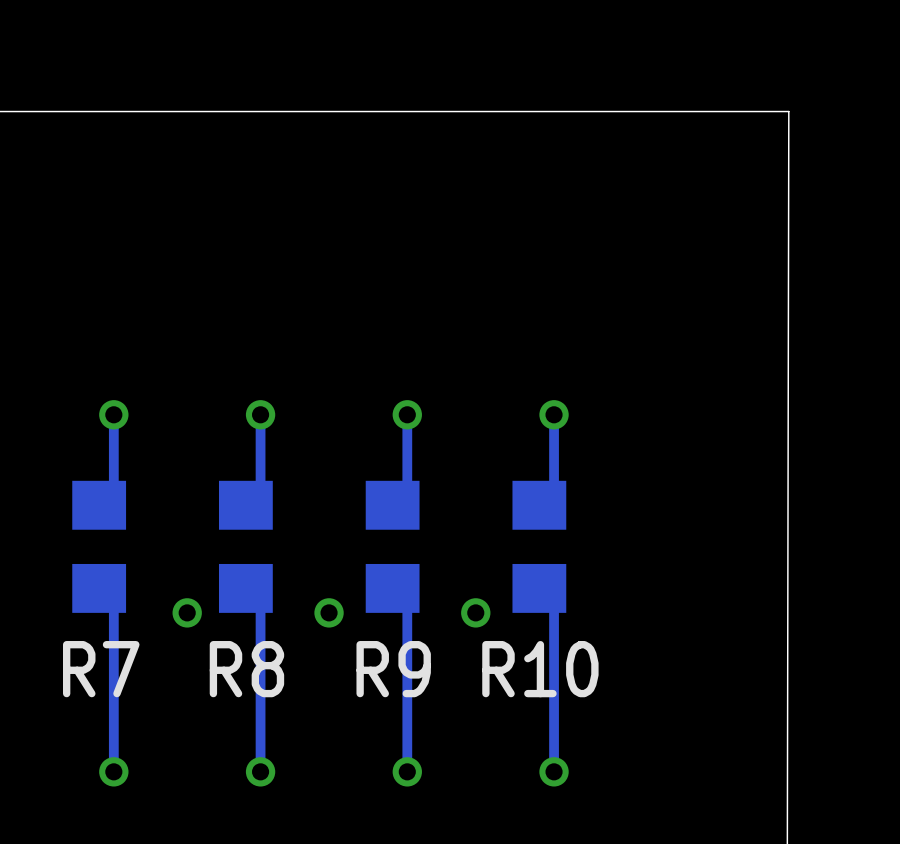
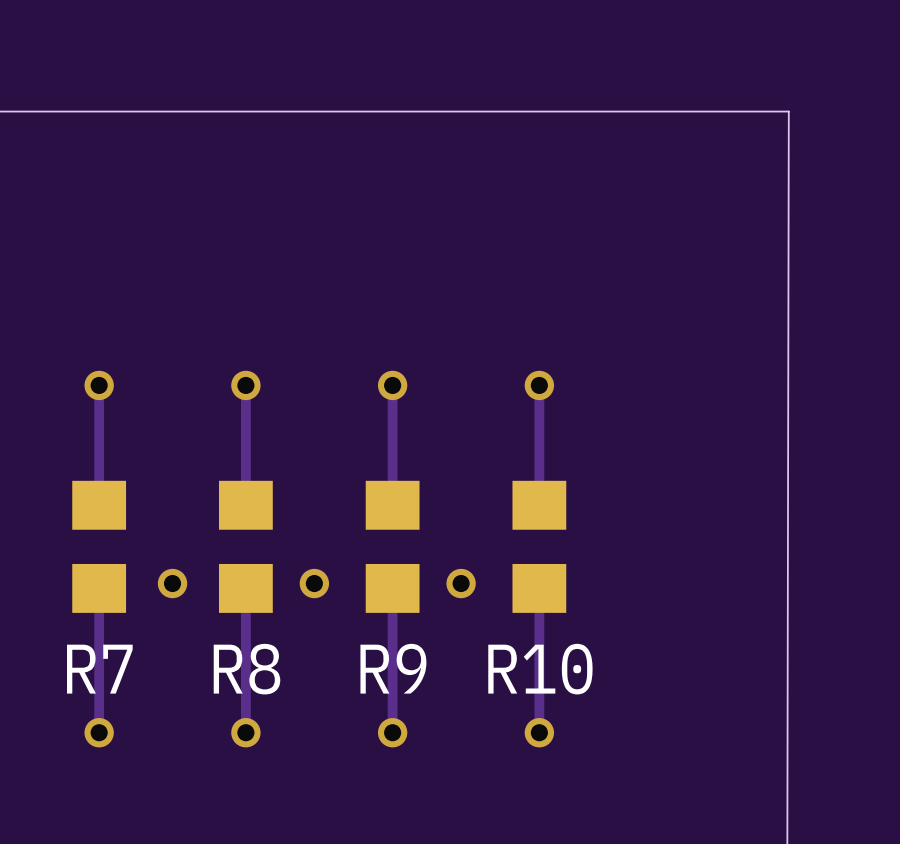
track: (113, 414) (113, 490) (99, 505) -> (99, 385) (99, 505)
via position: (113, 414) -> (99, 385)
track: (260, 414) (260, 490) (245, 505) -> (245, 385) (245, 505)
via position: (260, 414) -> (245, 385)
track: (407, 414) (407, 490) (392, 505) -> (392, 385) (392, 505)
via position: (407, 414) -> (392, 385)
track: (554, 414) (554, 490) (539, 505) -> (539, 385) (539, 505)
via position: (554, 414) -> (539, 385)
track: (99, 588) (113, 603) (113, 771) -> (99, 588) (99, 732)
track: (245, 588) (260, 603) (260, 771) -> (245, 588) (245, 732)
track: (392, 588) (407, 603) (407, 771) -> (392, 588) (392, 732)
track: (539, 588) (554, 603) (554, 771) -> (539, 588) (539, 732)
via position: (187, 612) -> (172, 583)
via position: (329, 612) -> (314, 583)
via position: (475, 612) -> (461, 583)
via position: (113, 771) -> (99, 732)
via position: (260, 771) -> (245, 732)
via position: (407, 771) -> (392, 732)
via position: (554, 771) -> (539, 732)

